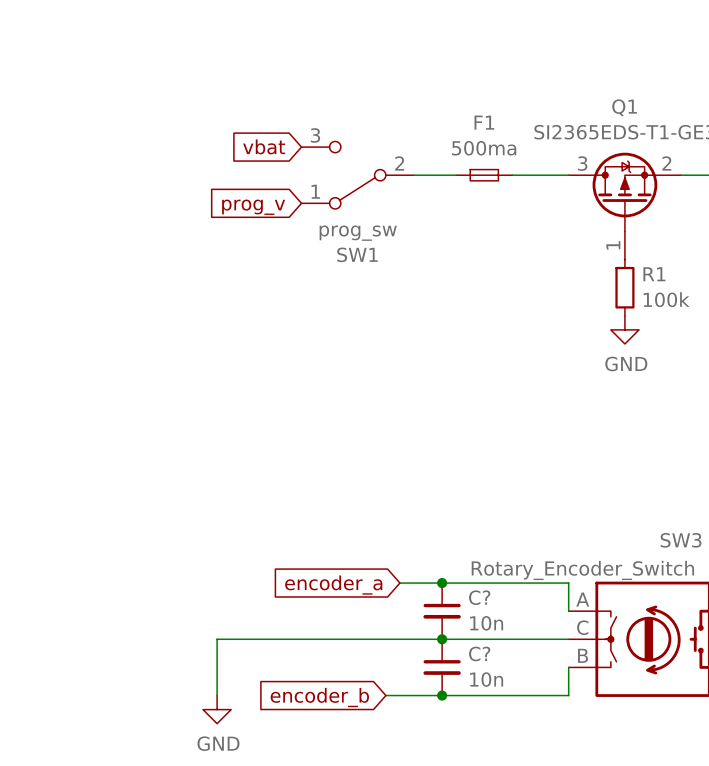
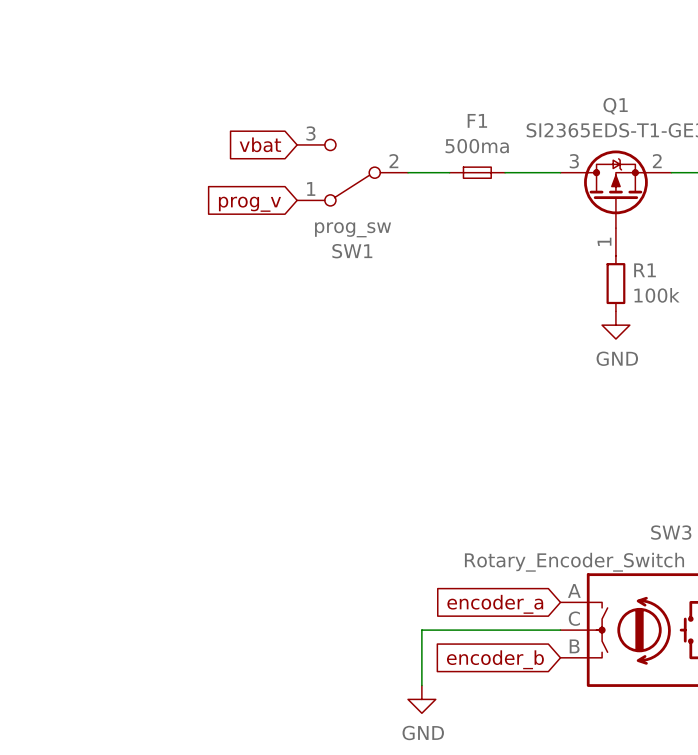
wire: (399, 583) (568, 583) (568, 611) -> none
junction: (442, 583) -> none
global label position: encoder_a (333, 585) -> encoder_a (495, 604)
C?: 10n (442, 611) -> none
wire: (428, 639) (217, 639) (217, 695) -> (421, 630) (421, 685)
junction: (442, 639) -> none
C?: 10n (442, 667) -> none
wire: (568, 667) (568, 695) (385, 695) -> none
junction: (442, 695) -> none
global label position: encoder_b (319, 697) -> encoder_b (495, 659)
power symbol position: GND (217, 709) -> GND (421, 699)

